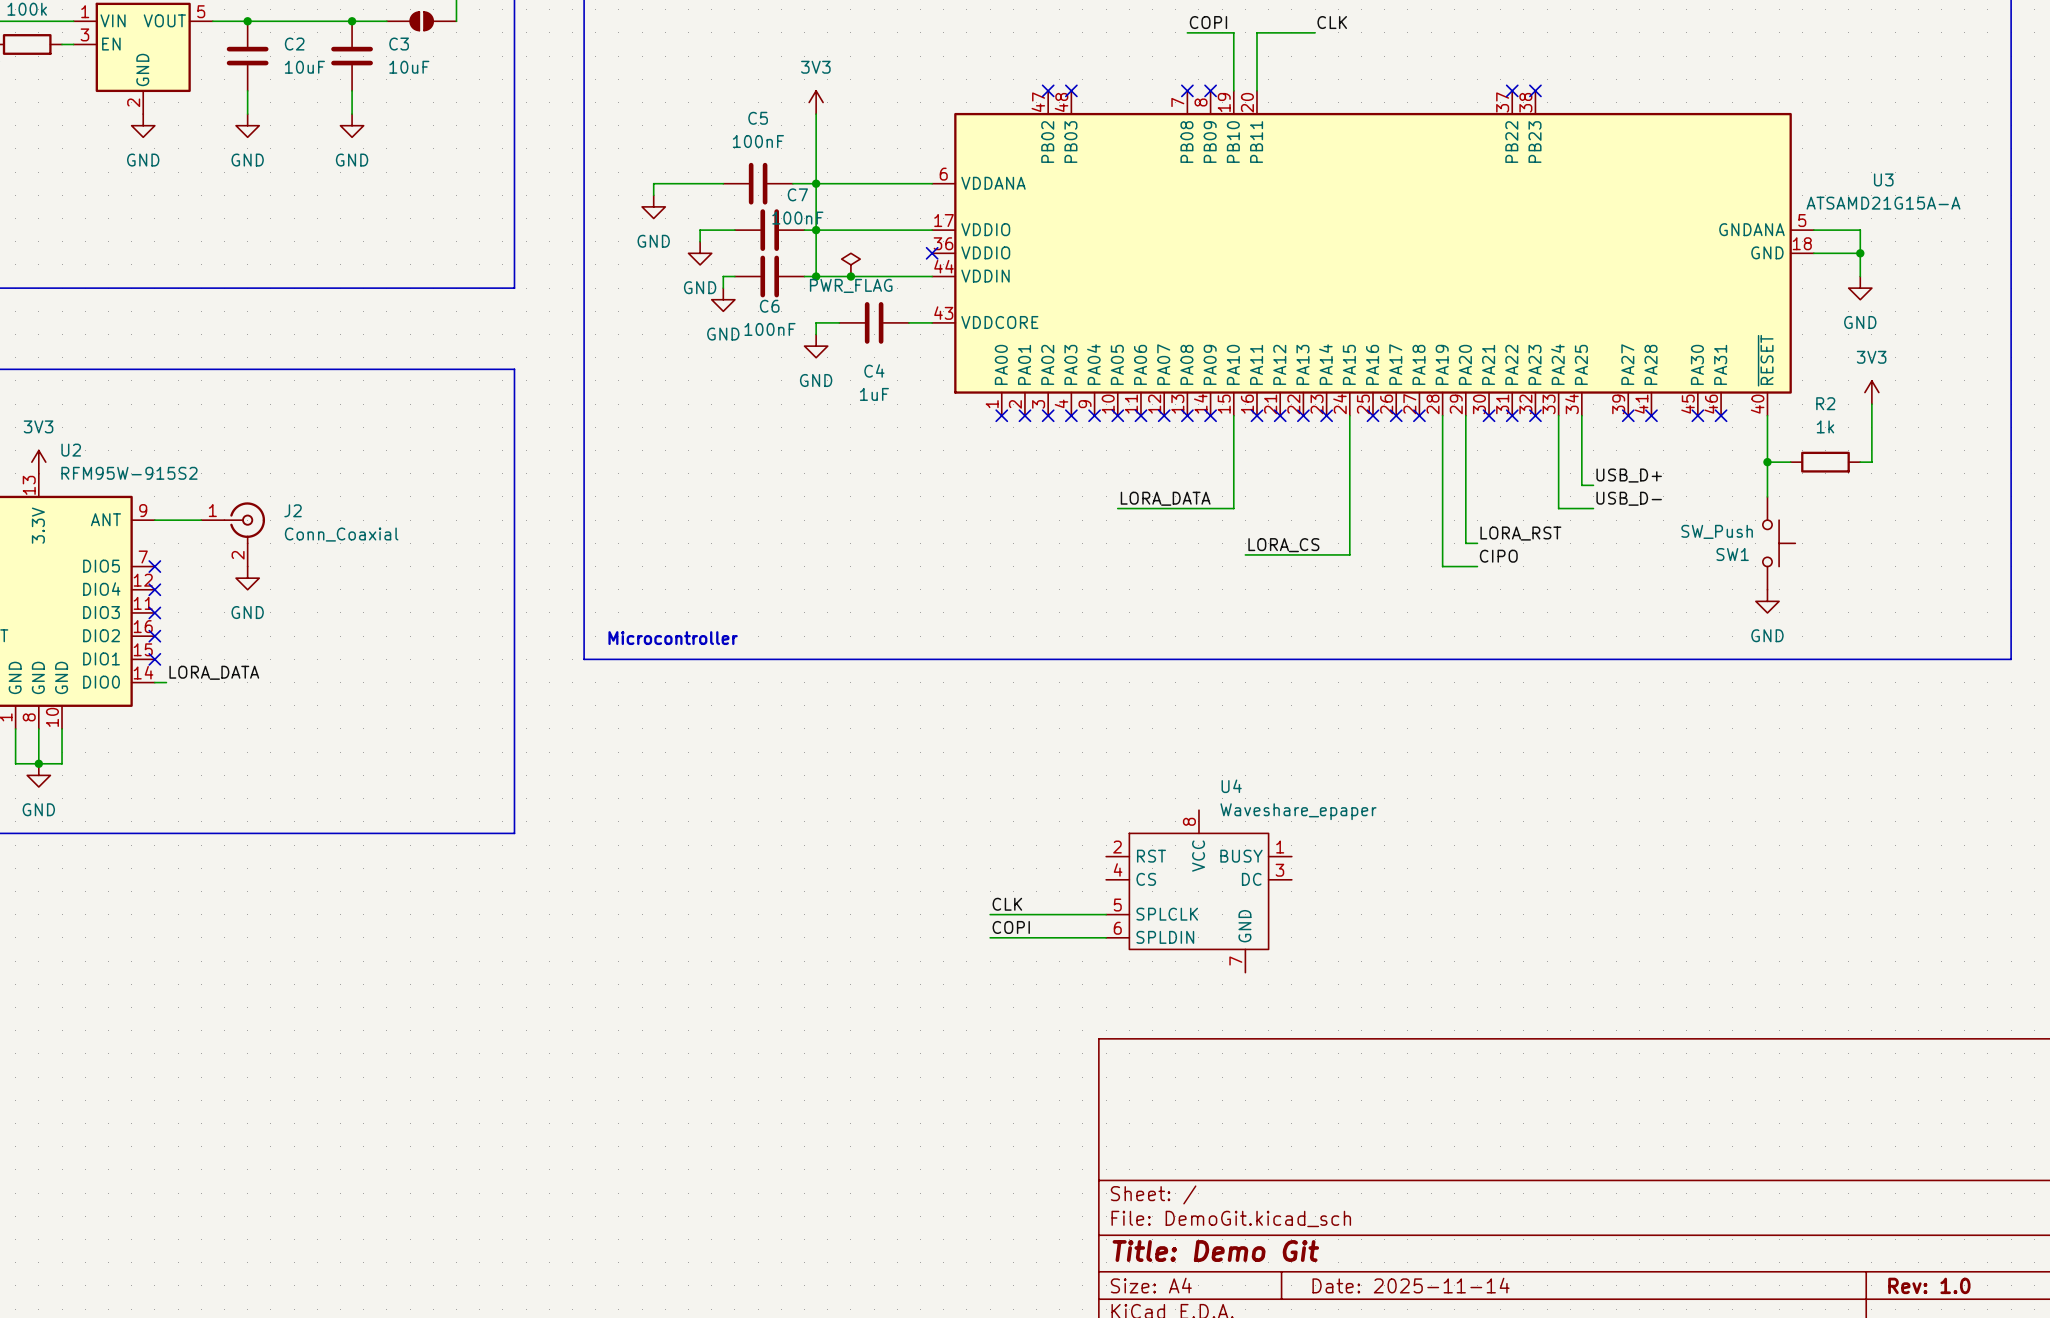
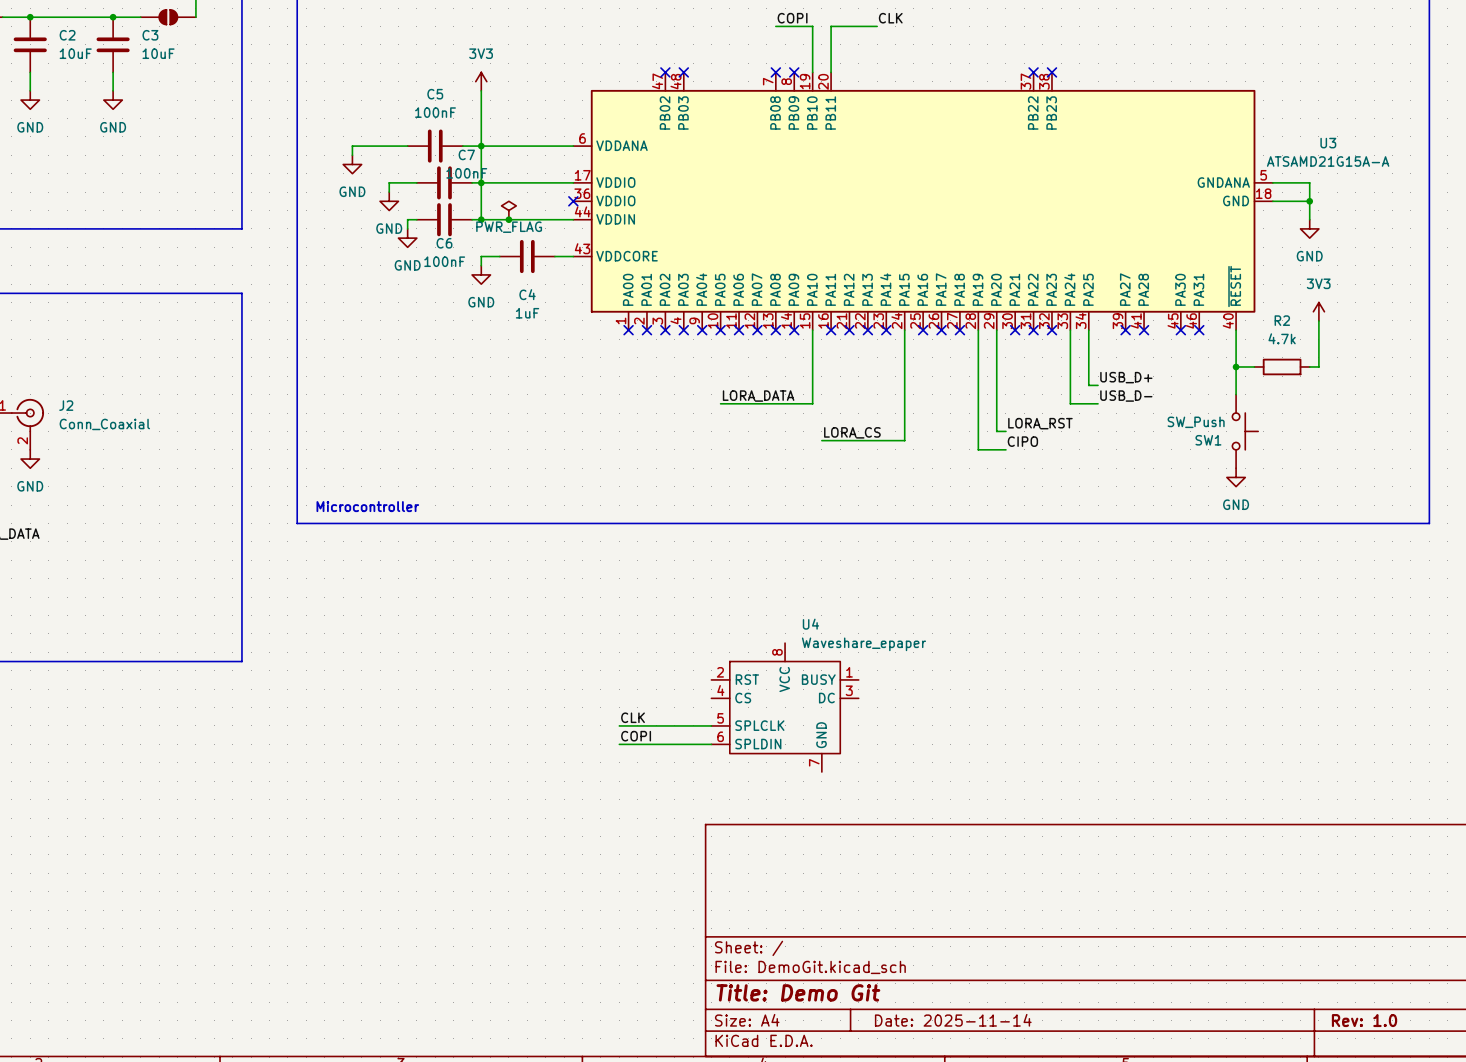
R2 value: 1k (1825, 426) -> 4.7k (1282, 338)

